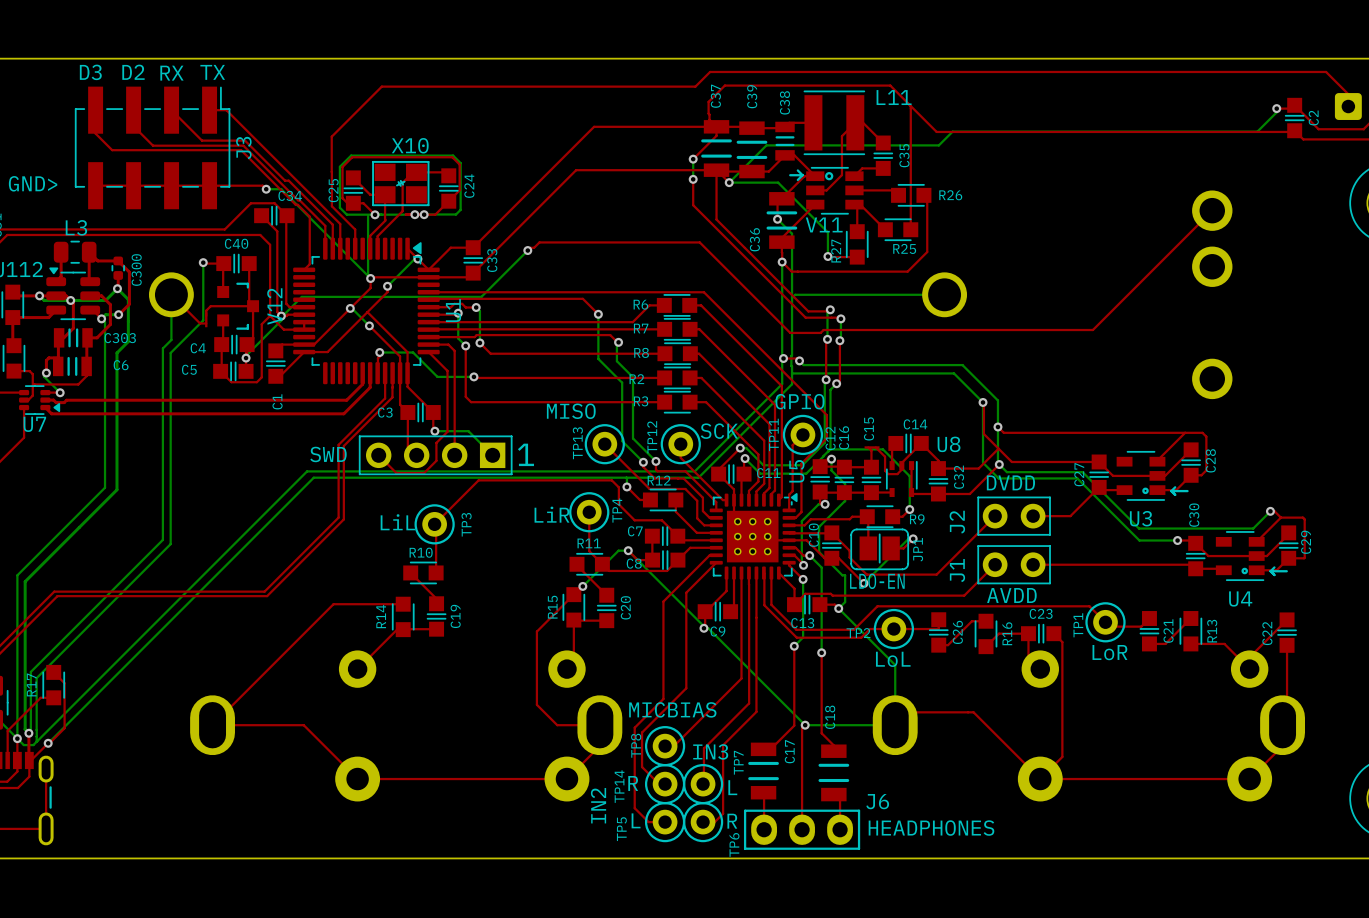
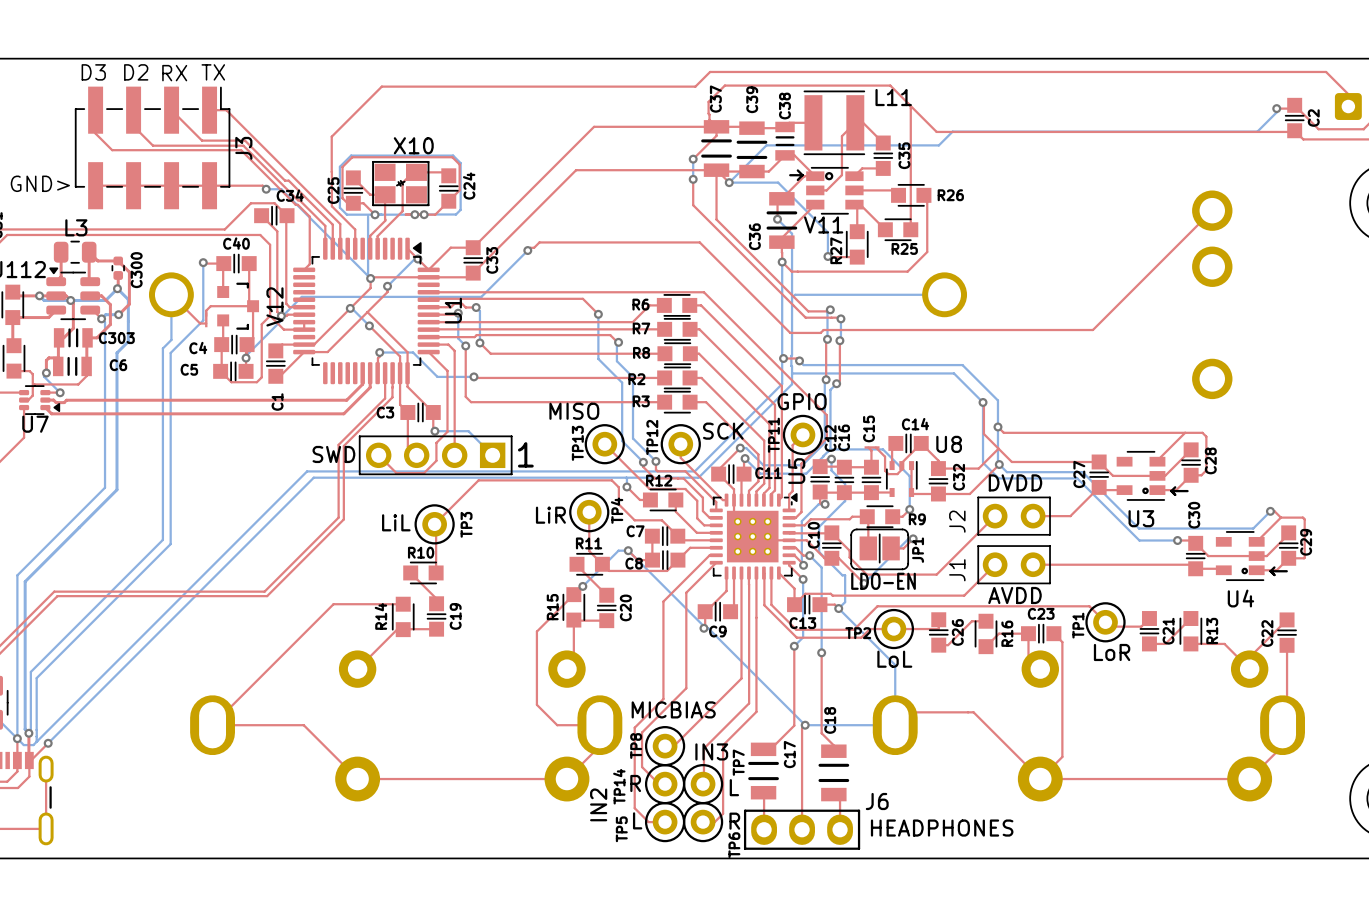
top track: (53, 672) (64, 683) (64, 728) (48, 743) -> none
R17: (53, 685) -> none
top track: (53, 697) (40, 697) (7, 730) (7, 760) -> none

